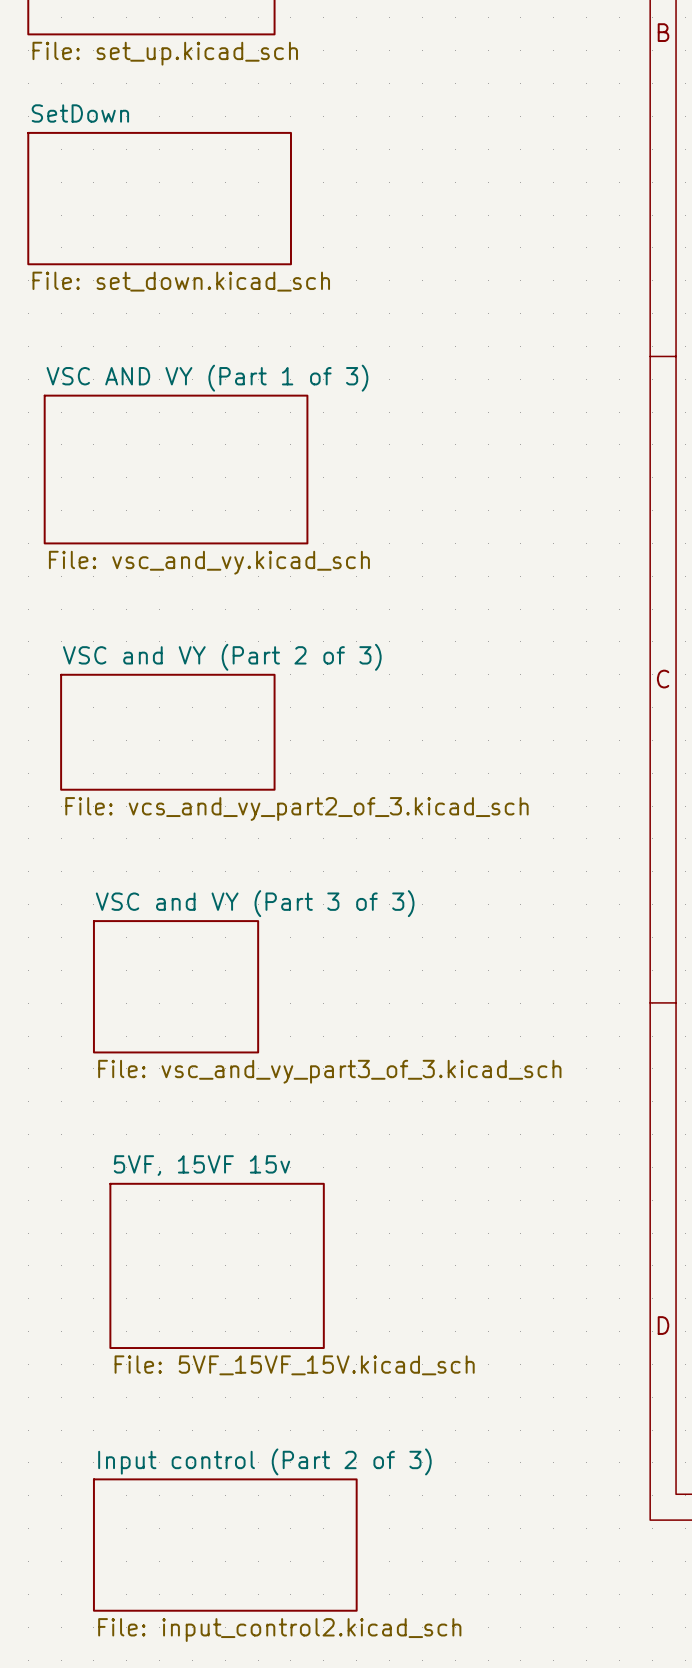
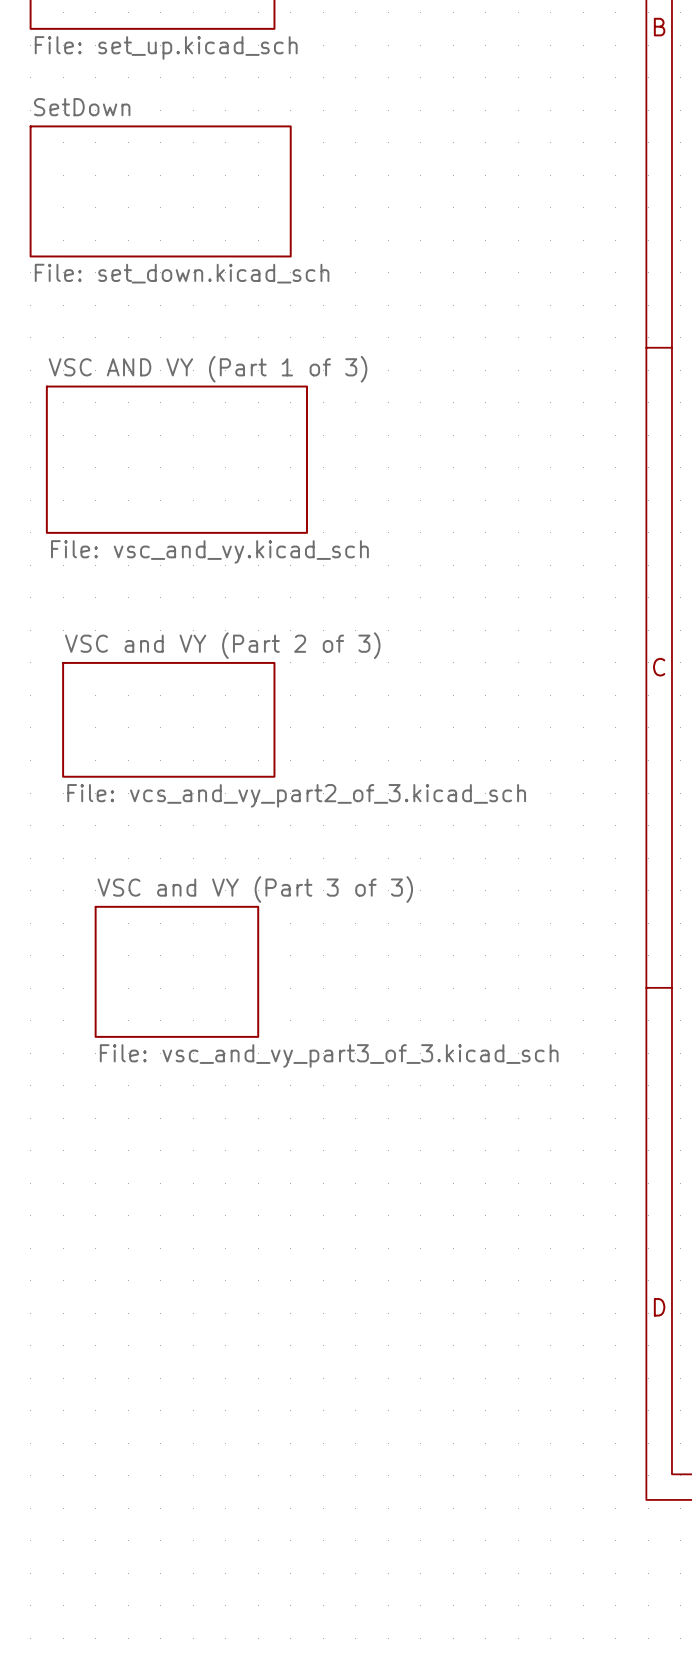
sheet 5VF, 15VF 15v: File: 5VF_15VF_15V.kicad_sch (217, 1265) -> none
sheet Input control (Part 2 of 3): File: input_control2.kicad_sch (225, 1545) -> none

